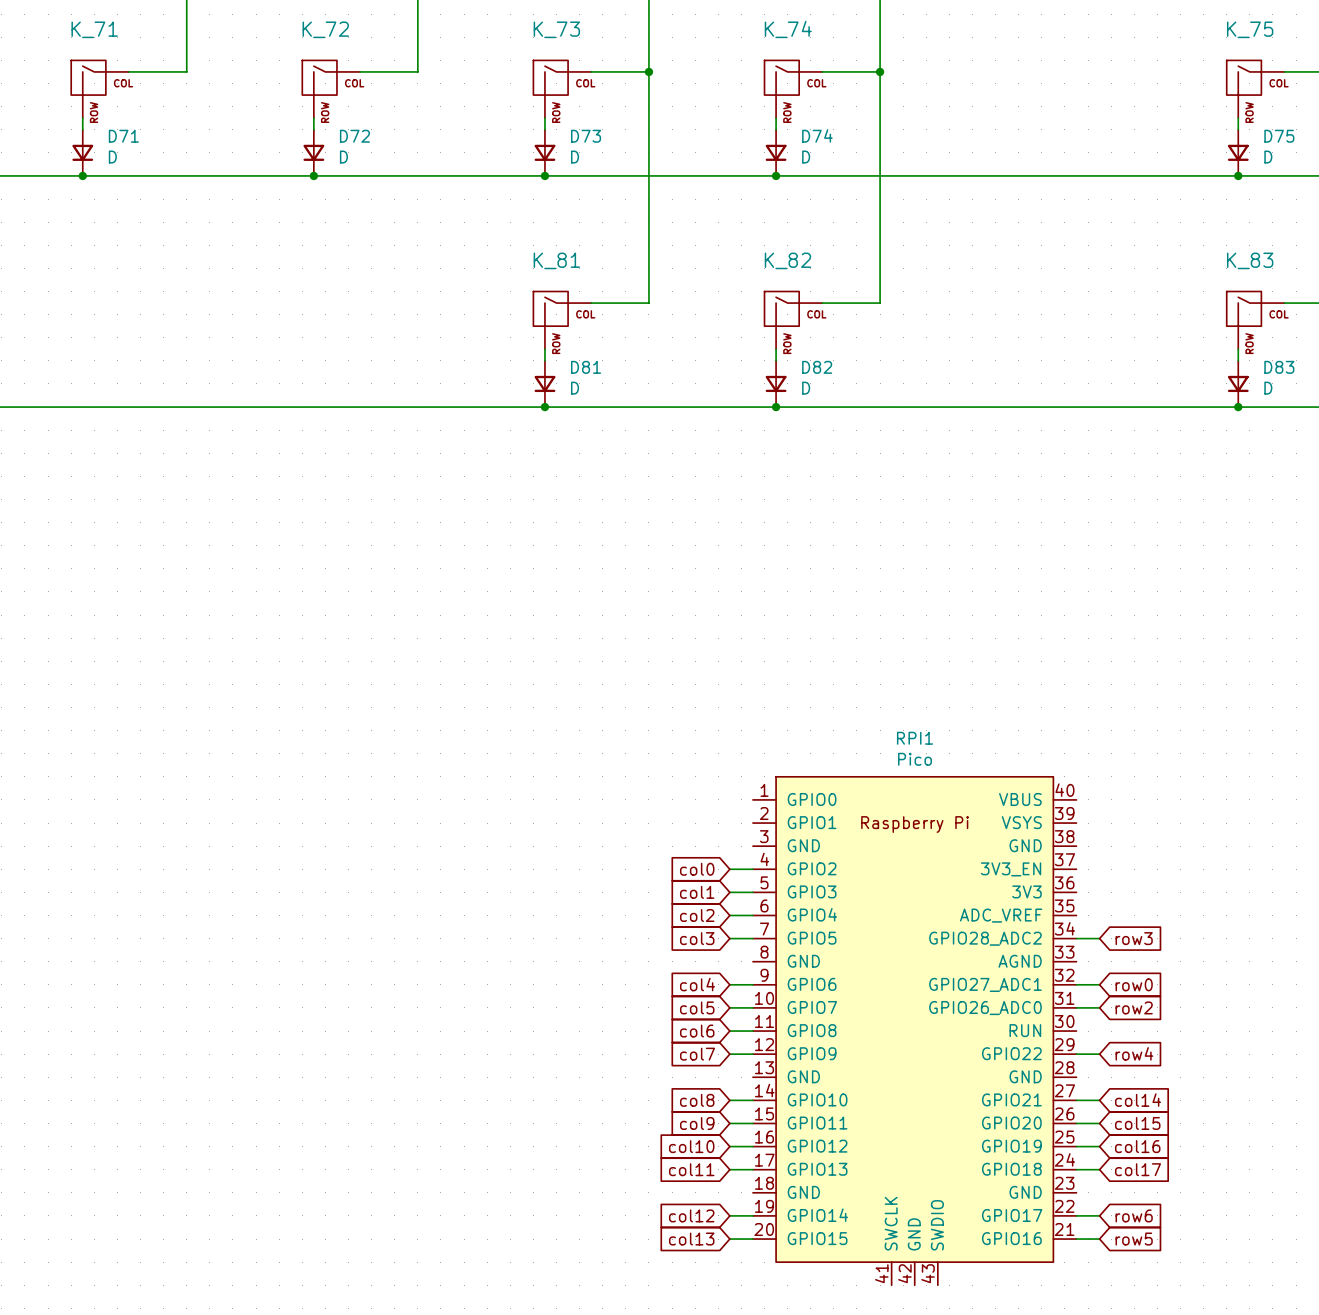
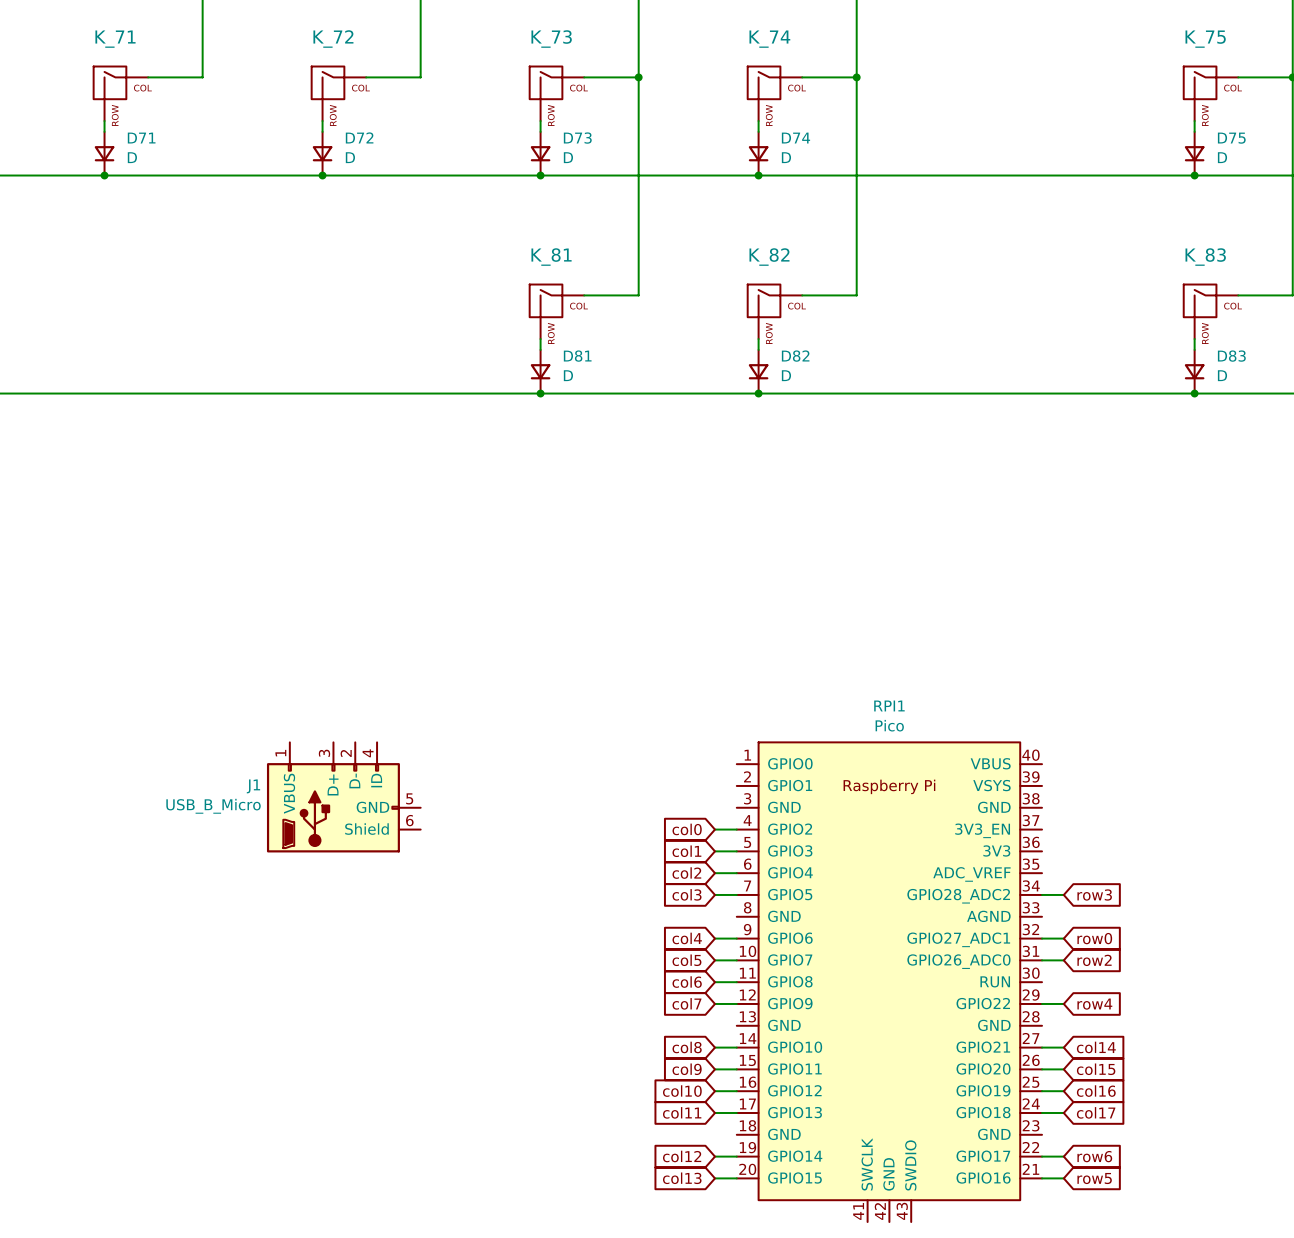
J1: none -> USB_B_Micro (343, 797)

